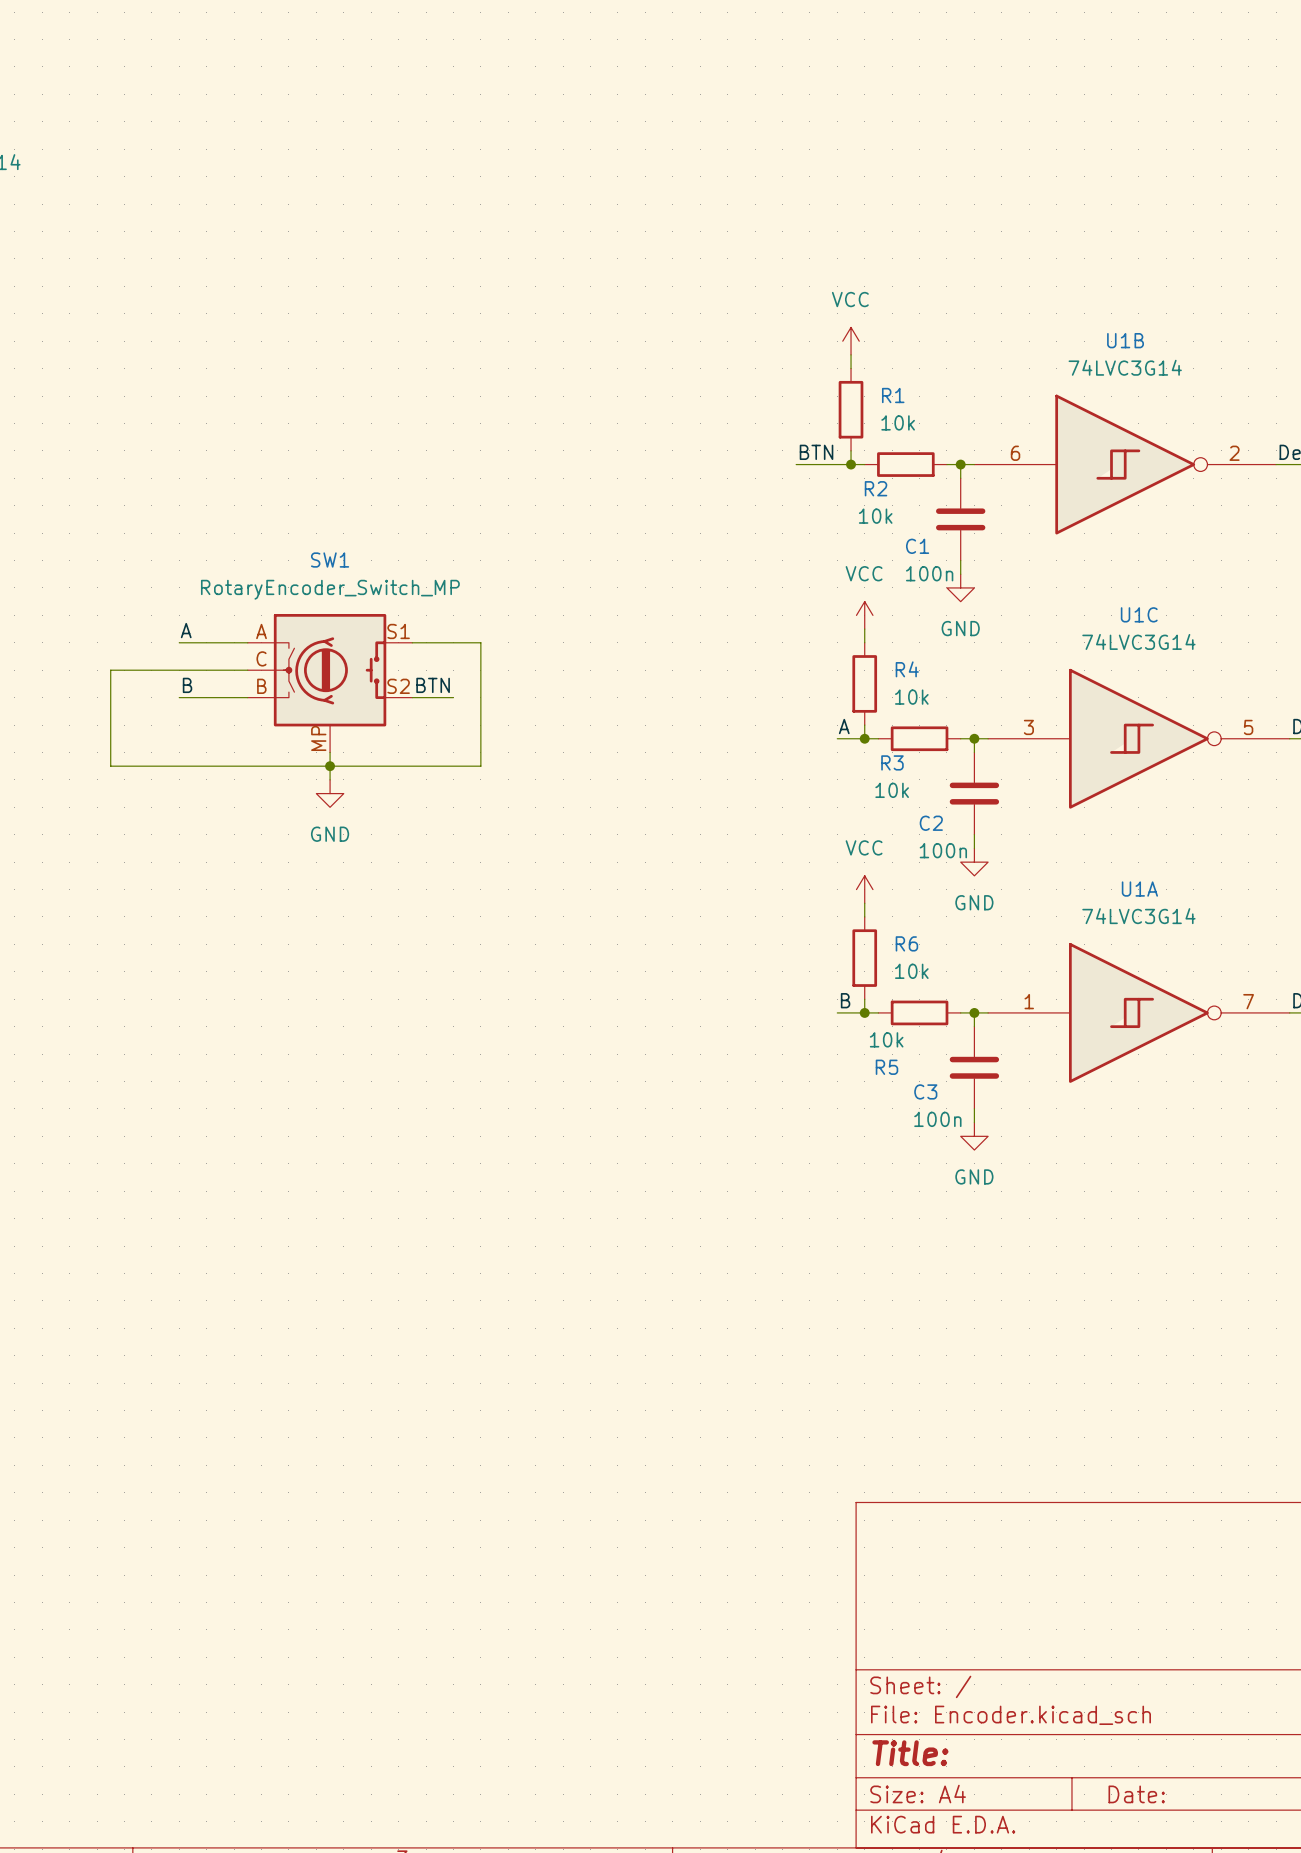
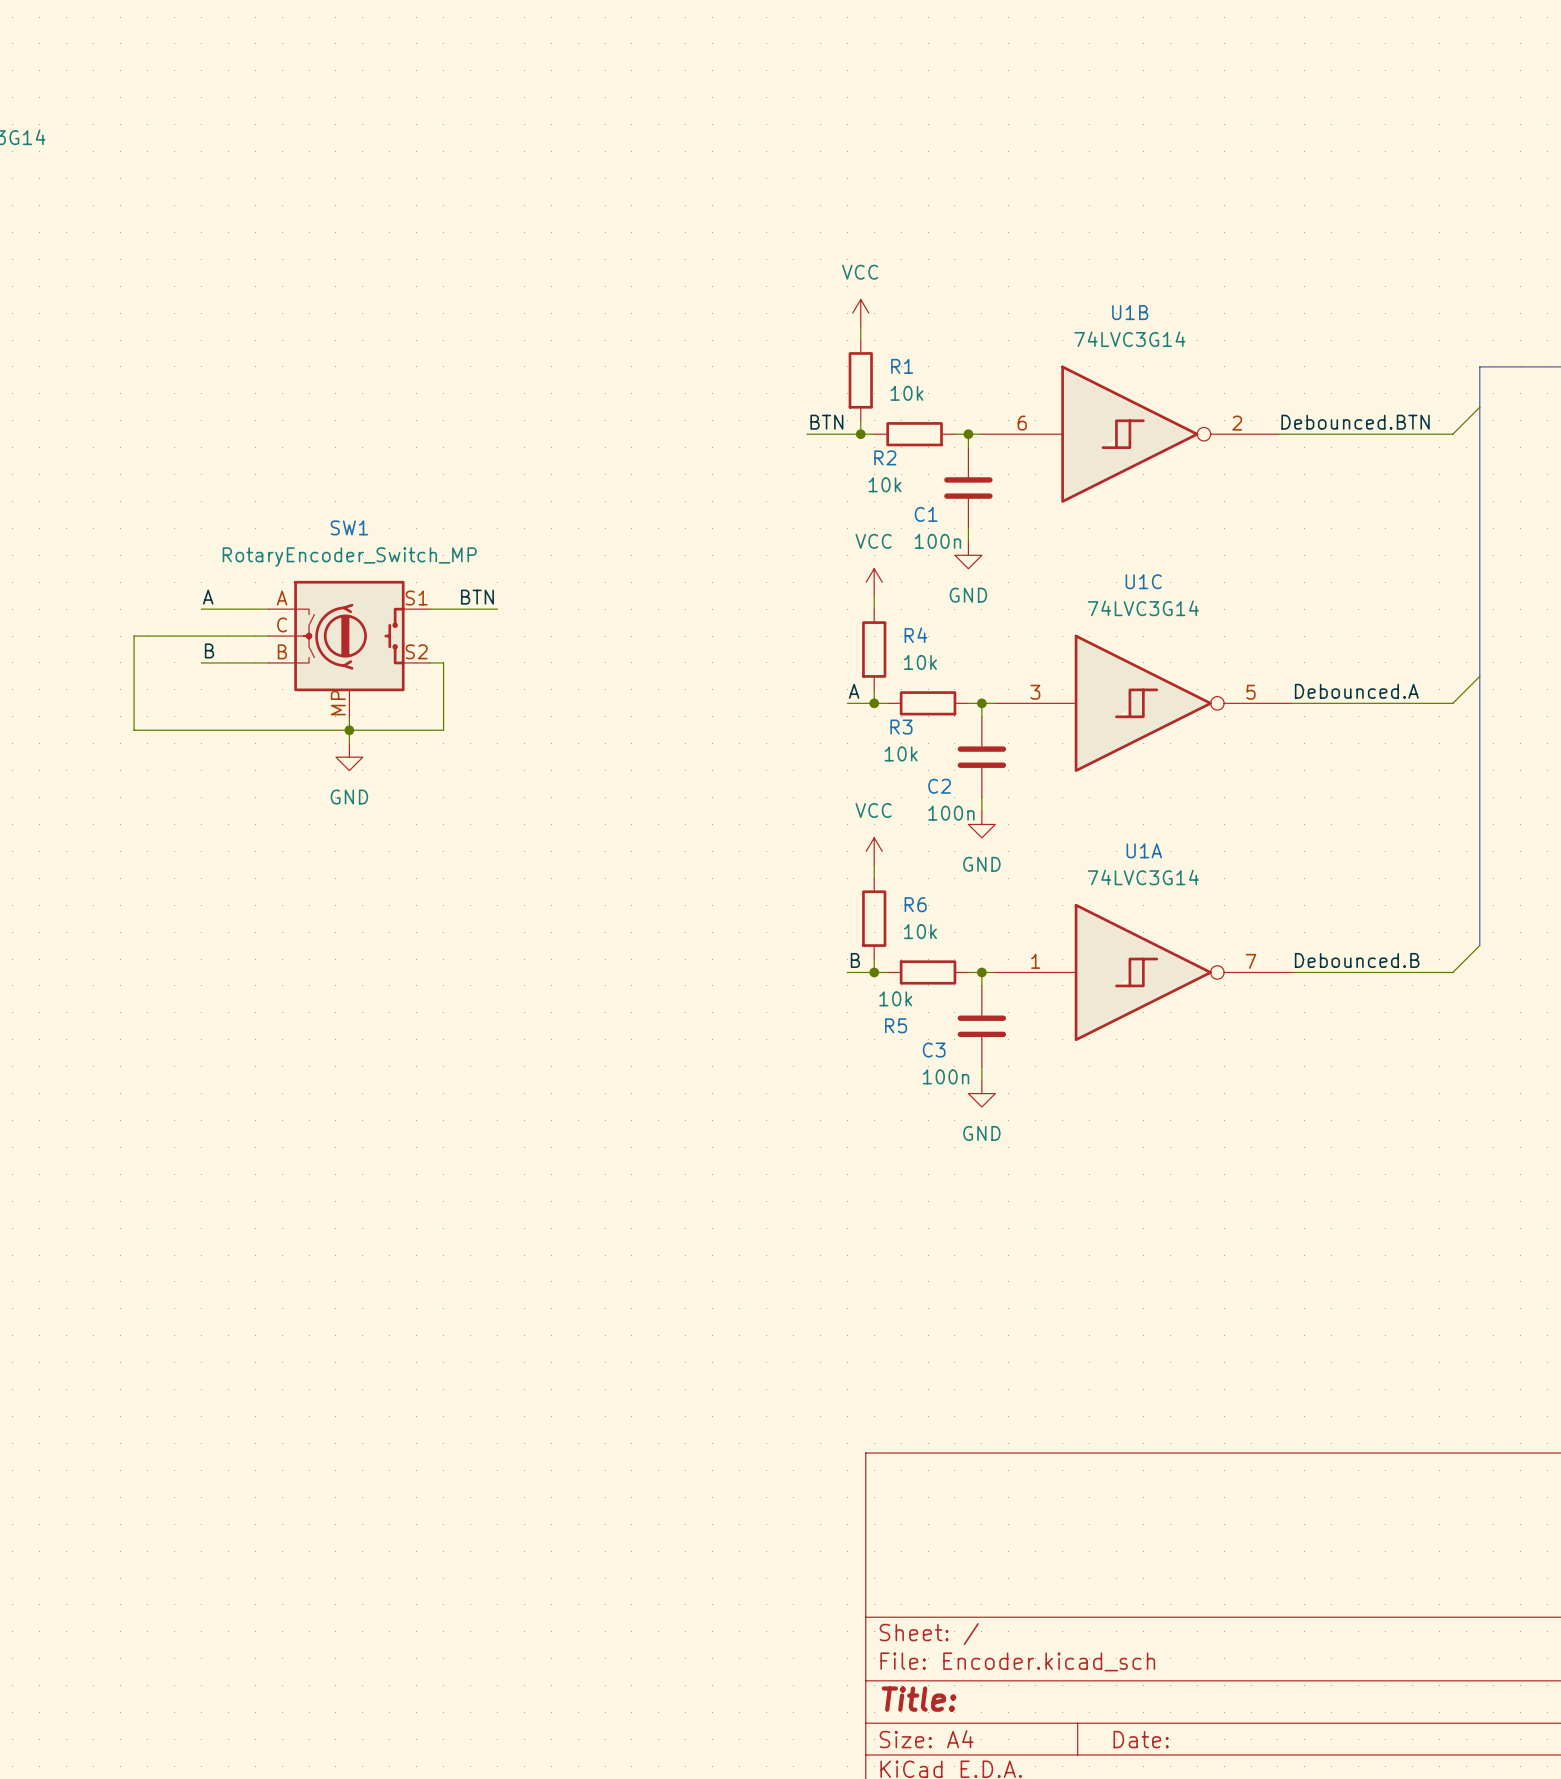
wire: (480, 642) (480, 766) (426, 766) -> none
label position: BTN (433, 685) -> BTN (477, 597)
wire: (426, 697) (453, 697) -> (443, 662) (443, 730)

